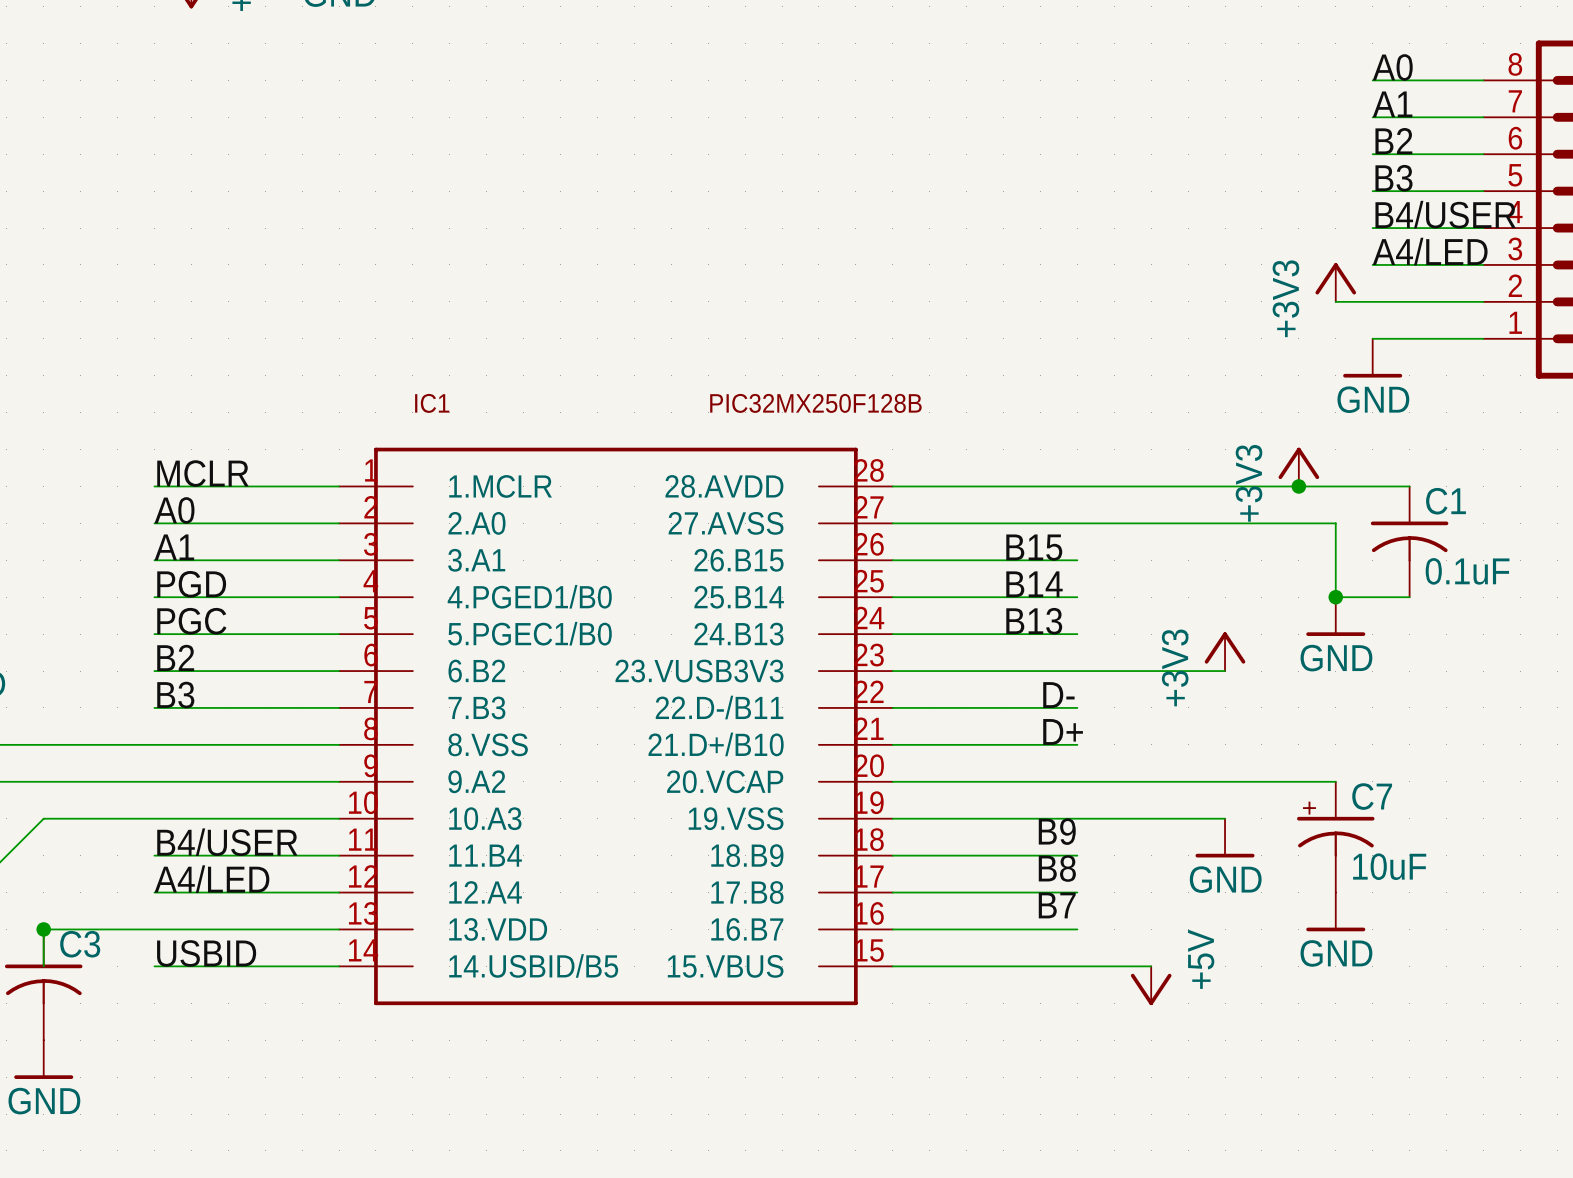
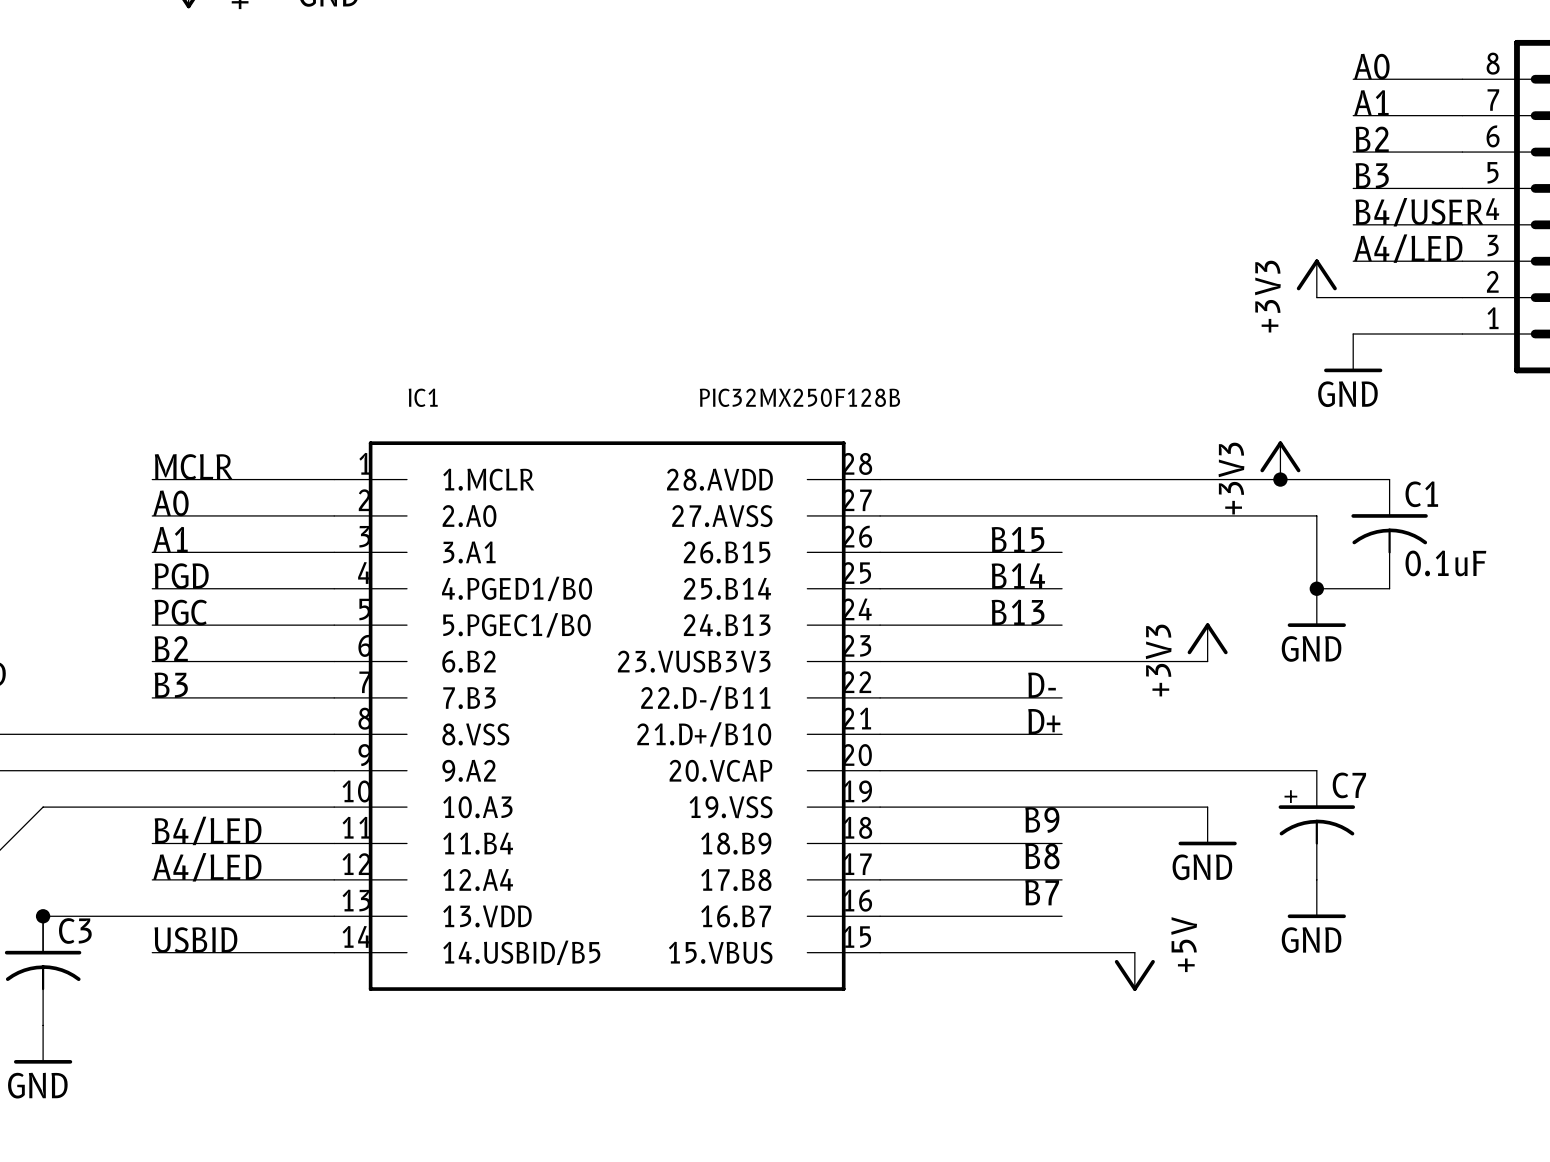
label: B4/USER (227, 842) -> B4/LED (208, 830)
C7 value: 10uF (1389, 866) -> none

